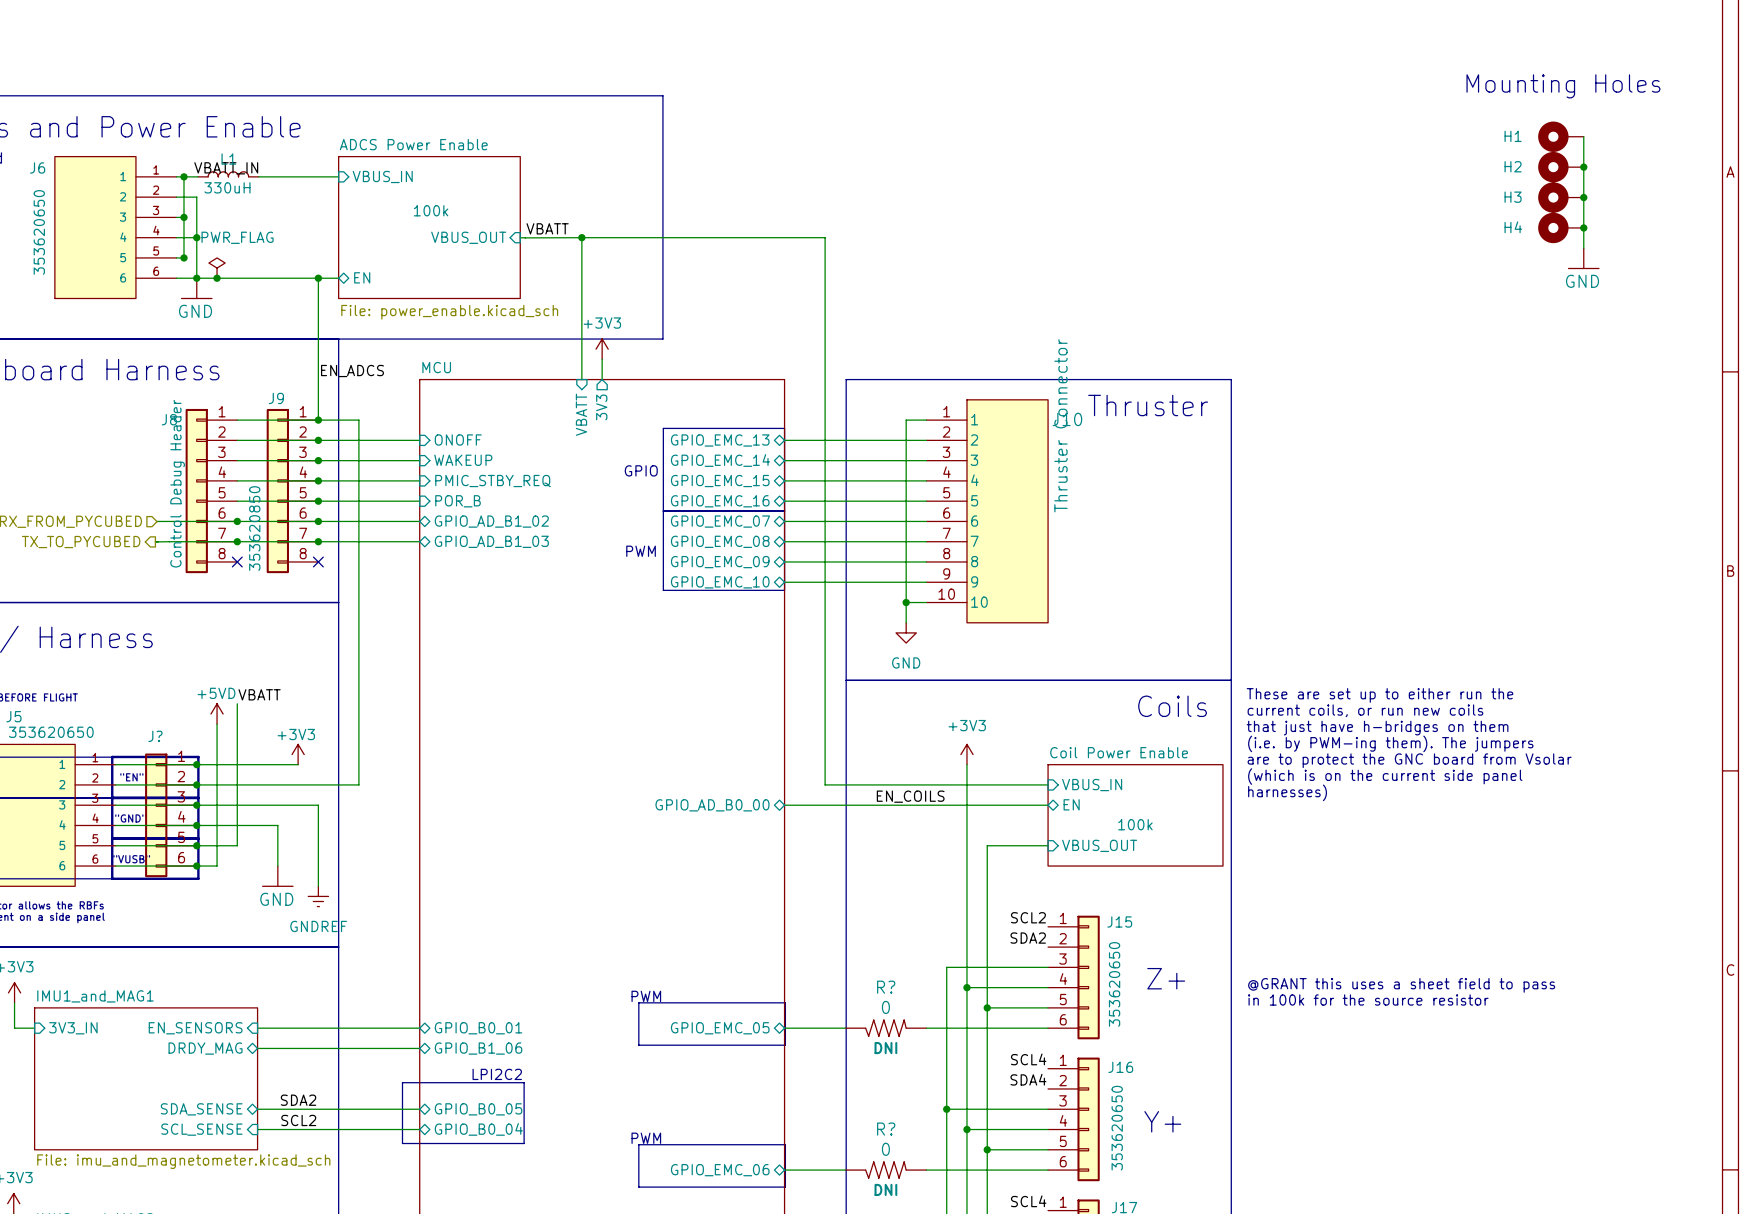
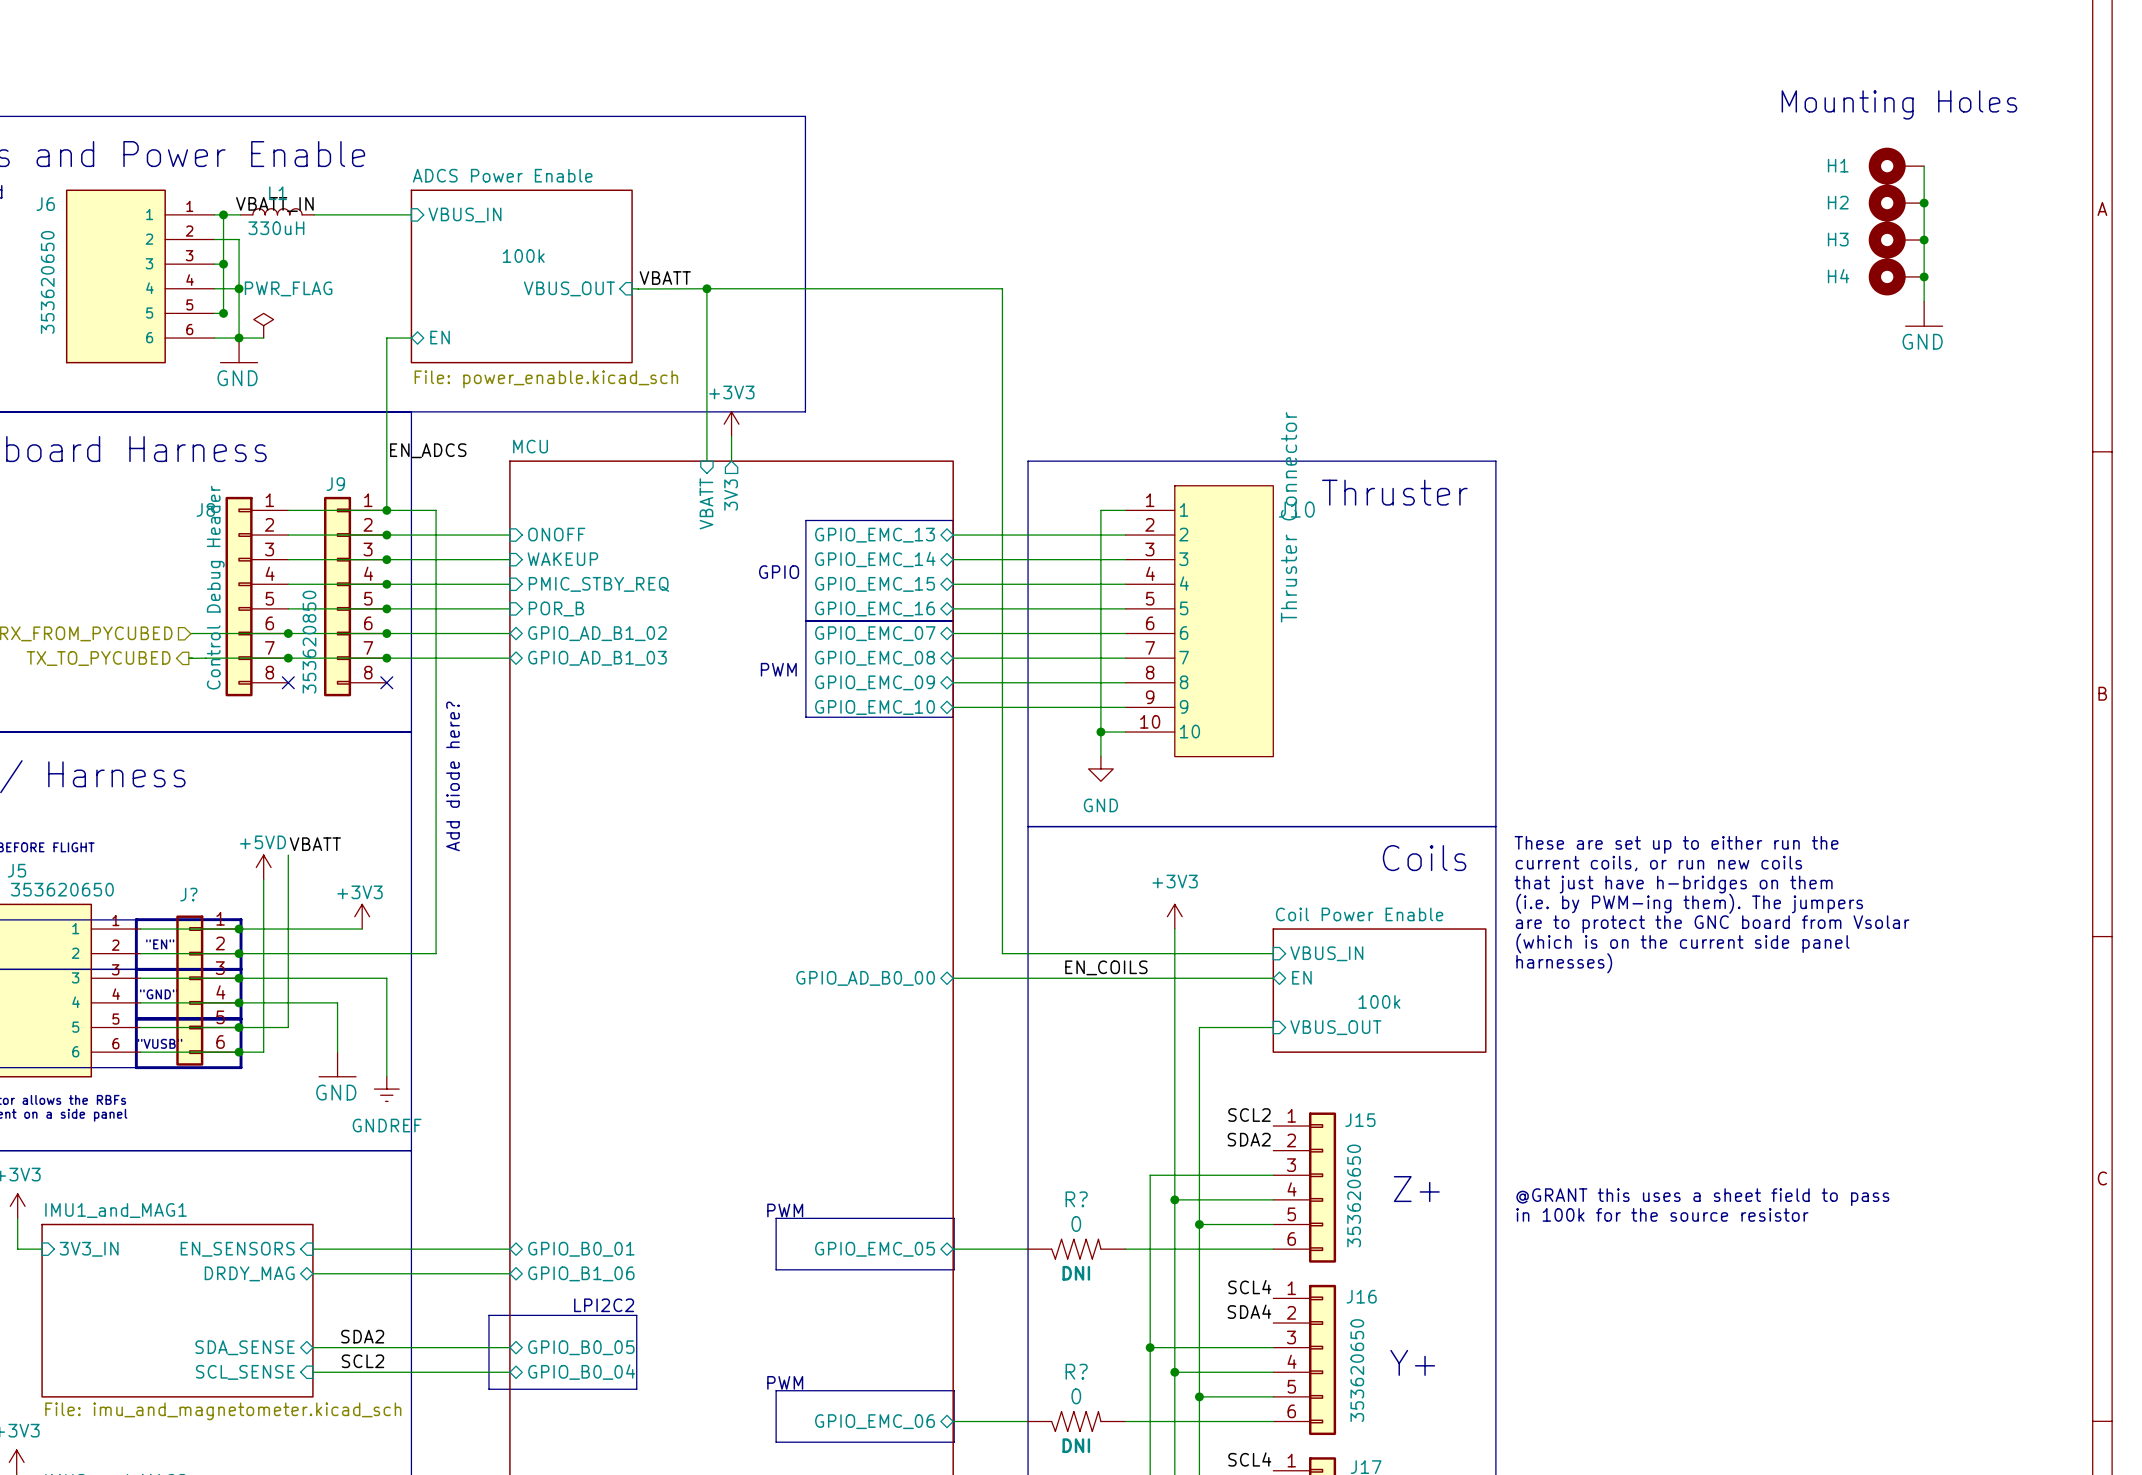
wire: (217, 278) (318, 278) -> none
junction: (217, 278) -> none
junction: (318, 278) -> none
text: none -> Add diode here? (453, 776)

